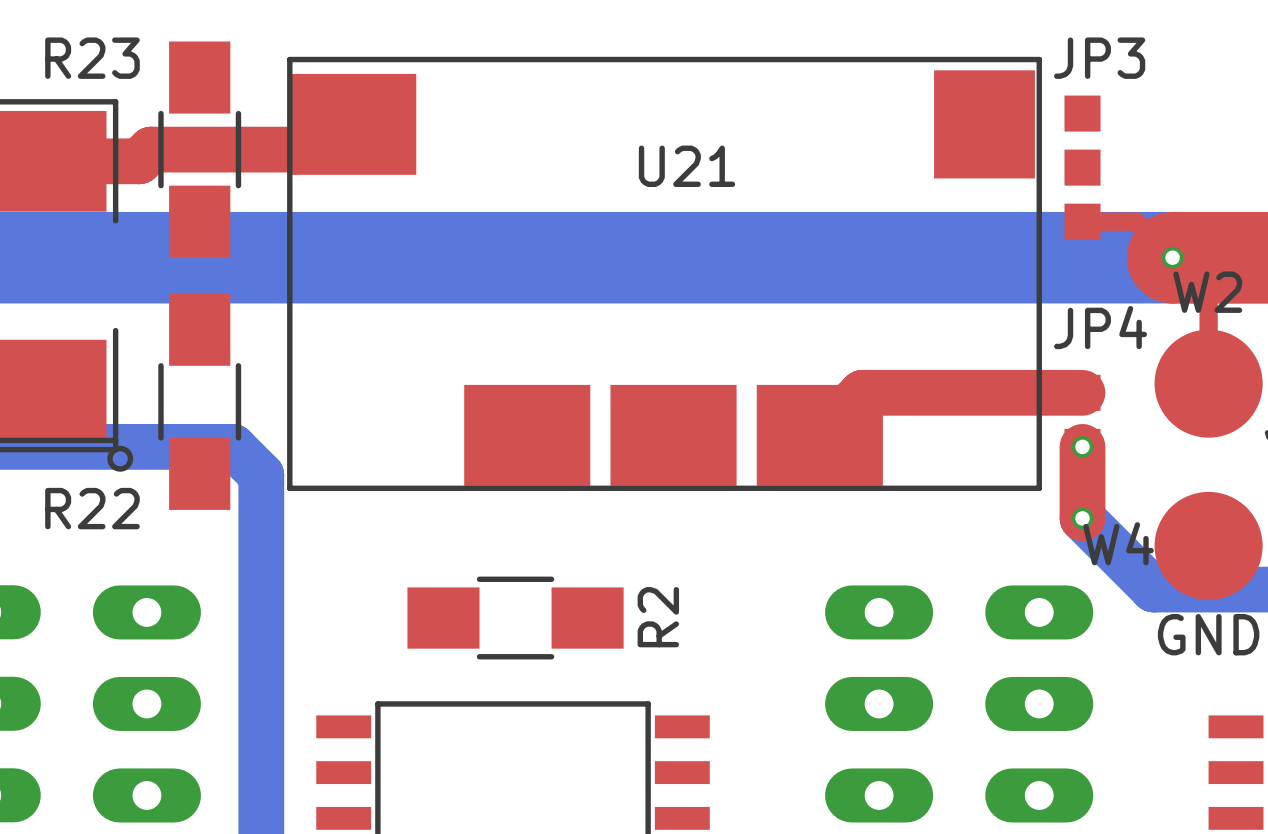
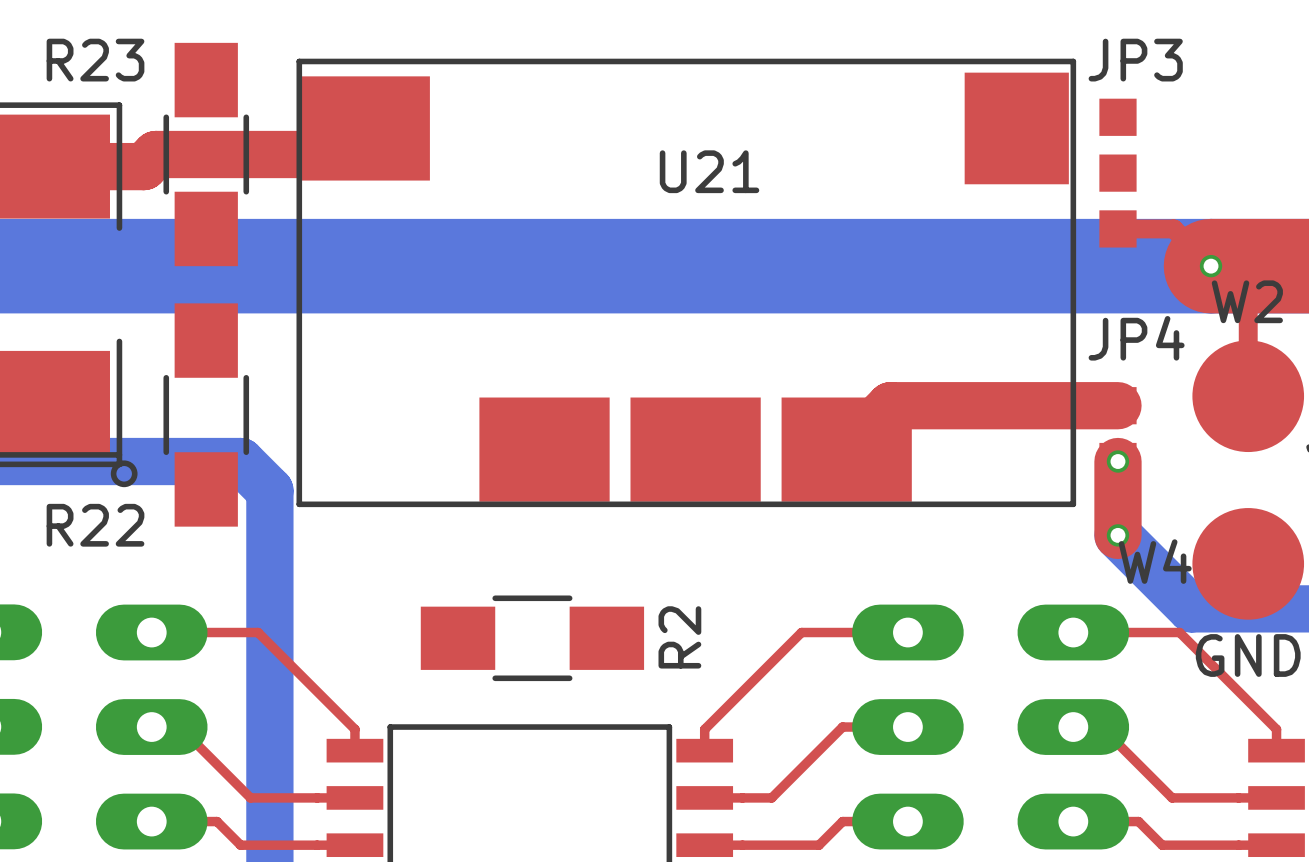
top track: none -> (151, 632) (258, 632) (354, 729) (354, 750)
top track: none -> (907, 632) (801, 632) (704, 729) (704, 750)
top track: none -> (1073, 632) (1179, 632) (1276, 729) (1276, 750)
top track: none -> (151, 727) (179, 727) (250, 797) (354, 797)
top track: none -> (907, 727) (842, 727) (771, 797) (704, 797)
top track: none -> (1073, 727) (1101, 727) (1172, 797) (1276, 797)
top track: none -> (151, 821) (217, 821) (240, 845) (354, 845)
top track: none -> (907, 821) (842, 821) (819, 845) (704, 845)
top track: none -> (1073, 821) (1138, 821) (1162, 845) (1276, 845)

